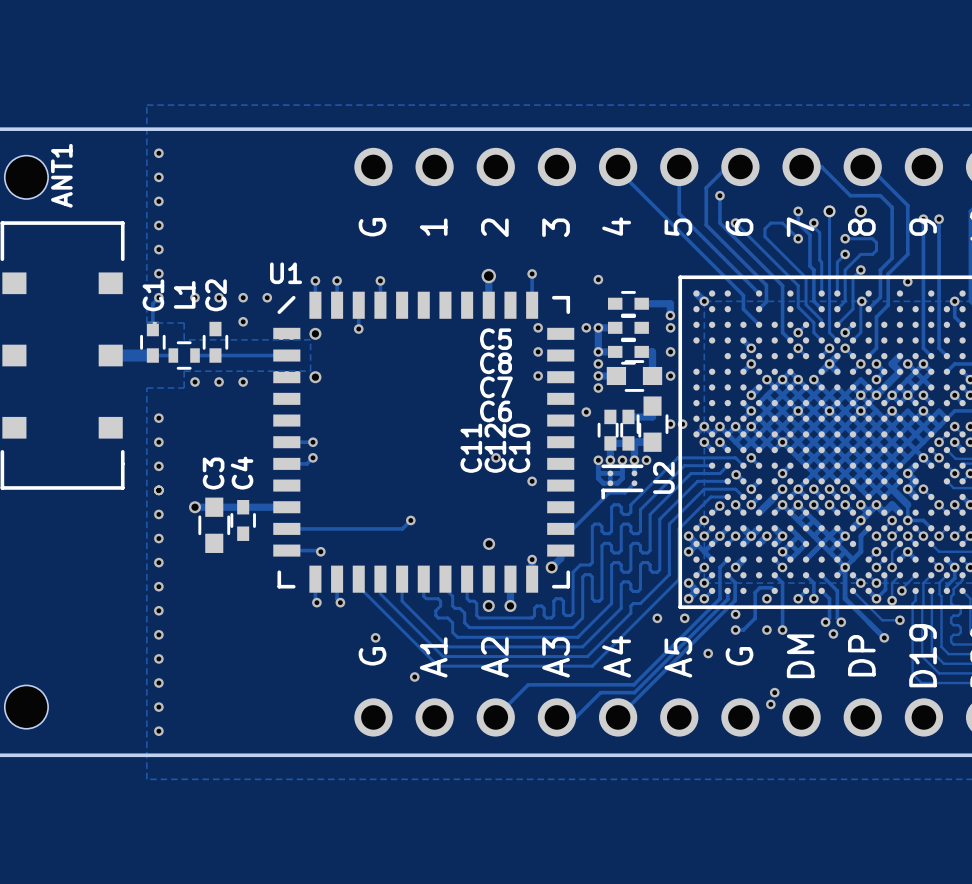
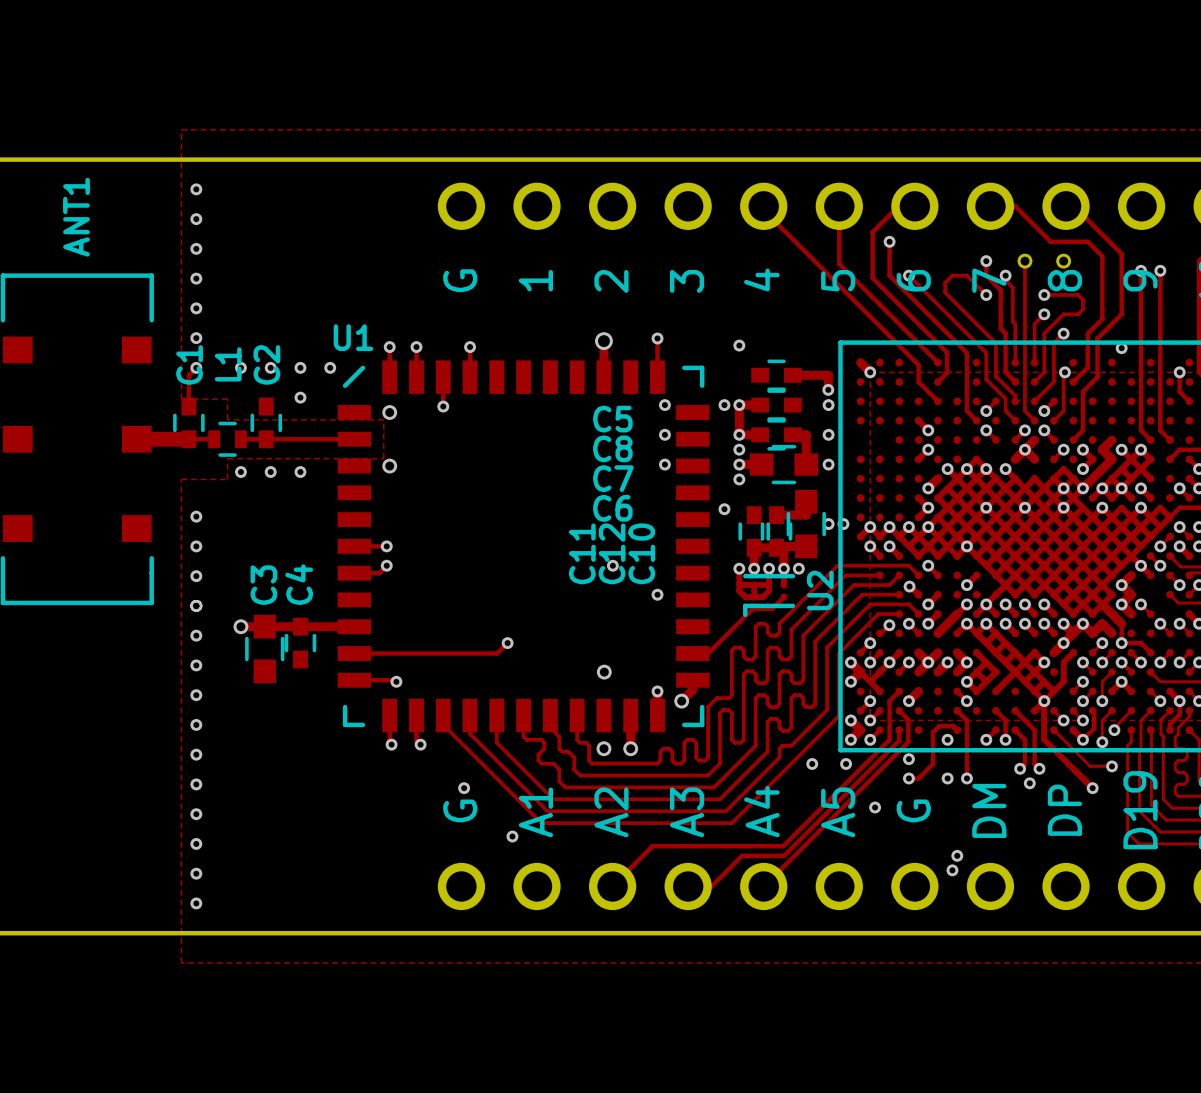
part: (26, 177) -> none
part: (26, 707) -> none

